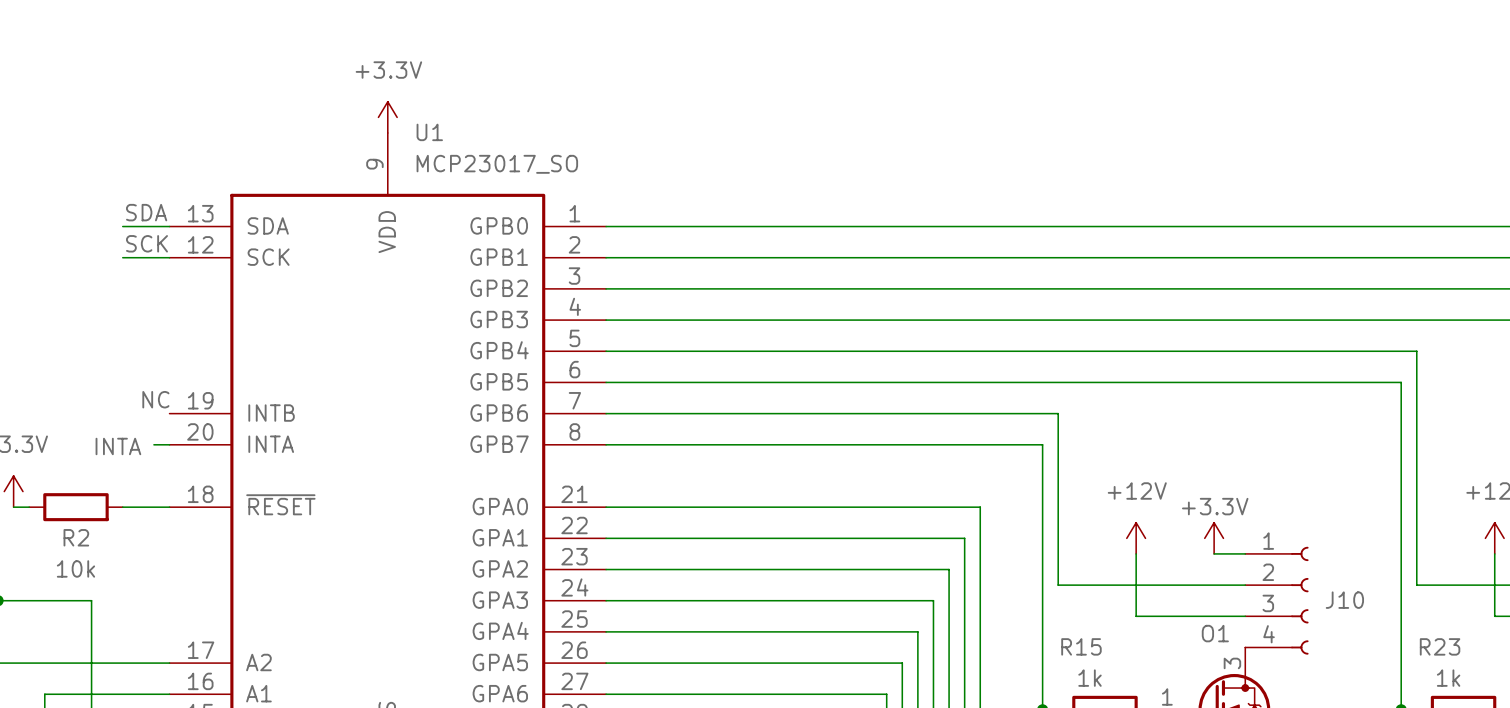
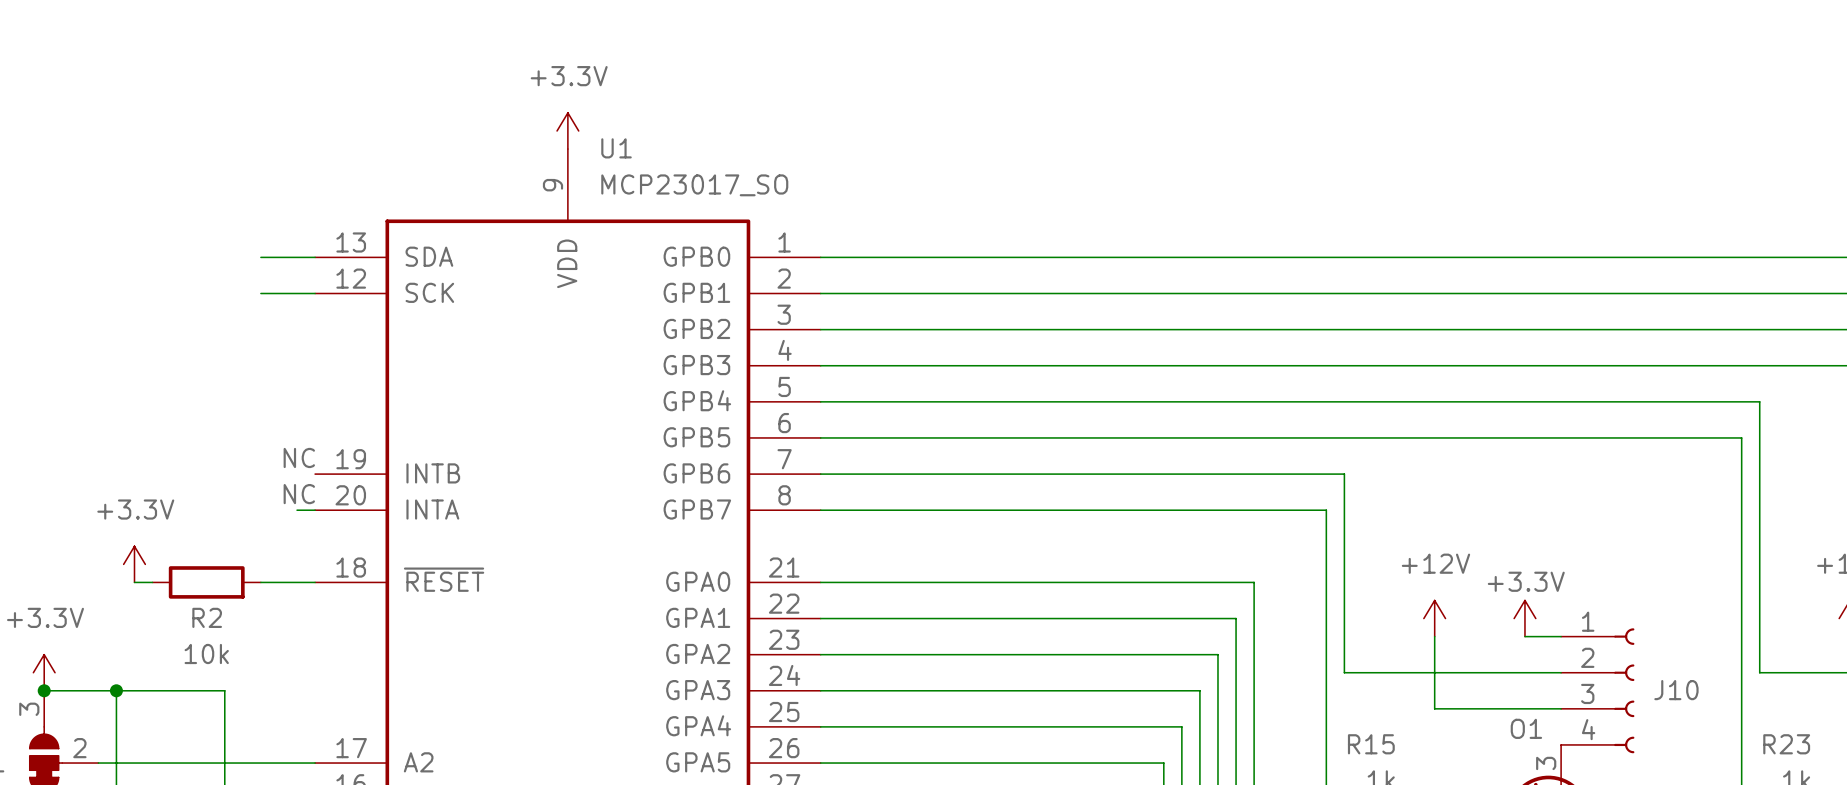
label: SDA (146, 212) -> none
label: SCK (146, 243) -> none
label: none -> NC (299, 494)
label: INTA (118, 446) -> none

